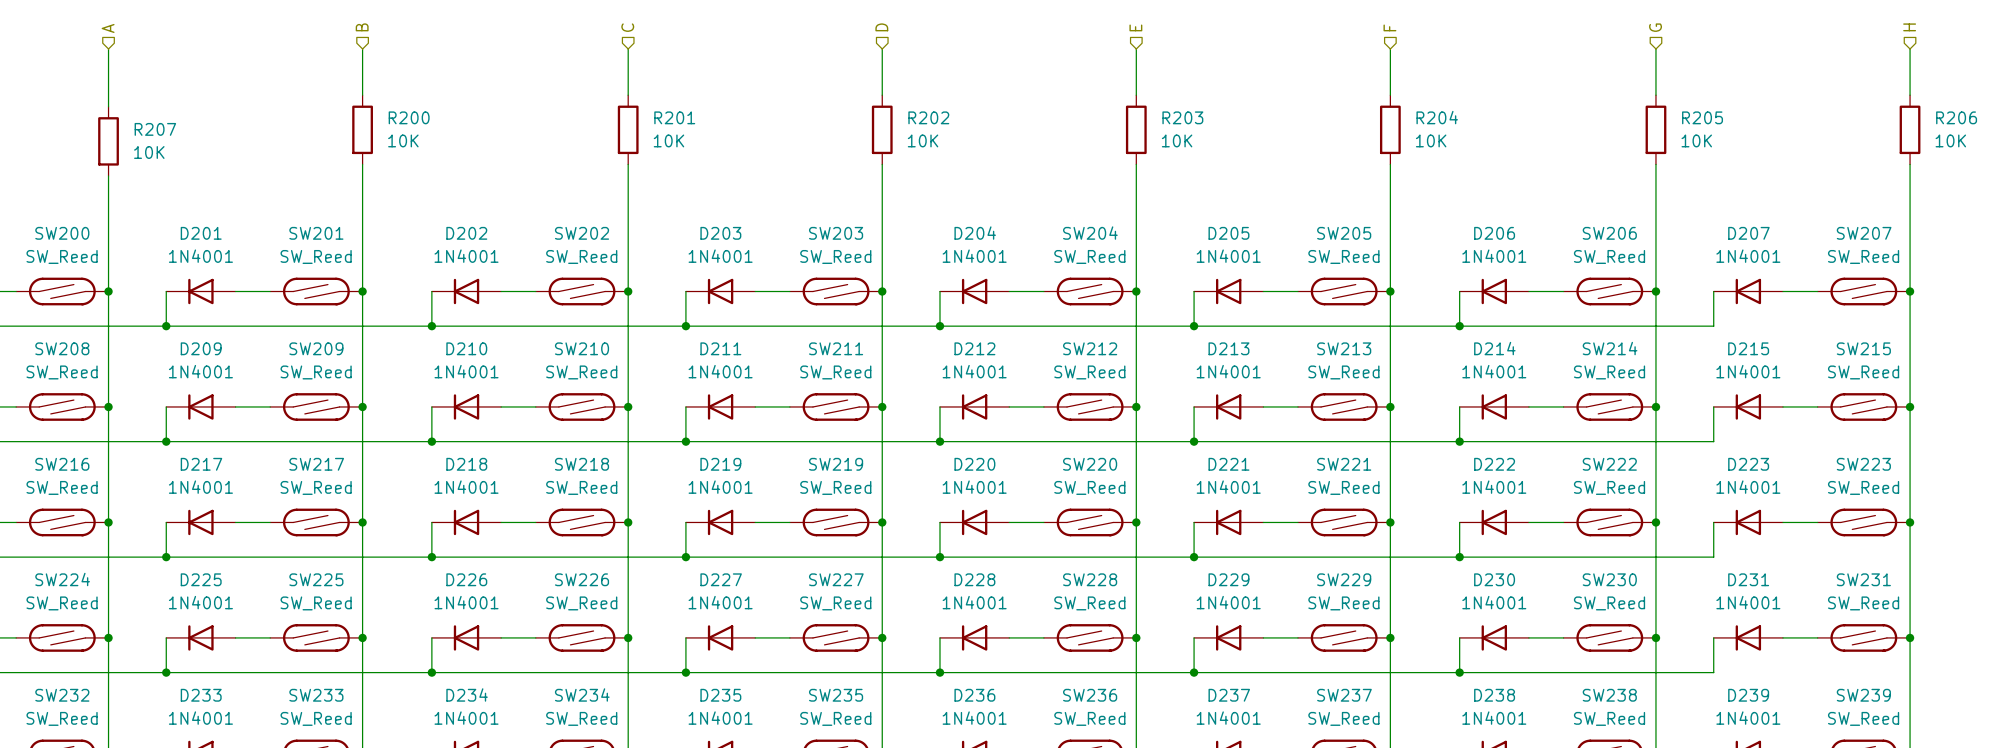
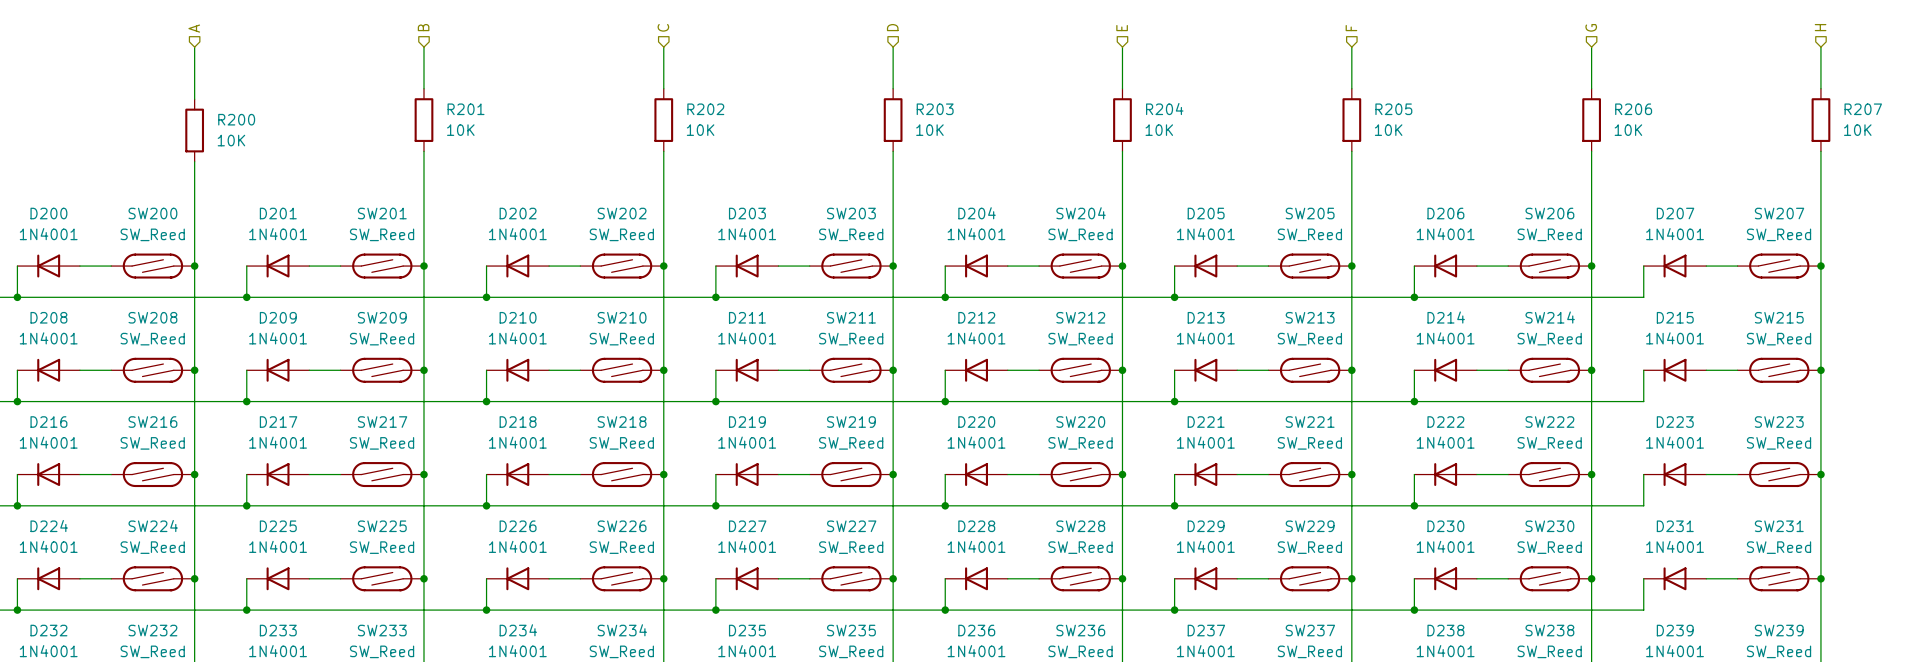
R200 name: R200 (409, 117) -> R201 (466, 109)
R201 name: R201 (674, 117) -> R202 (705, 109)
R202 name: R202 (928, 117) -> R203 (935, 109)
R203 name: R203 (1182, 117) -> R204 (1164, 109)
R204 name: R204 (1437, 117) -> R205 (1393, 109)
R205 name: R205 (1702, 117) -> R206 (1633, 109)
R206 name: R206 (1956, 117) -> R207 (1863, 109)
R207 name: R207 (155, 129) -> R200 (236, 119)

